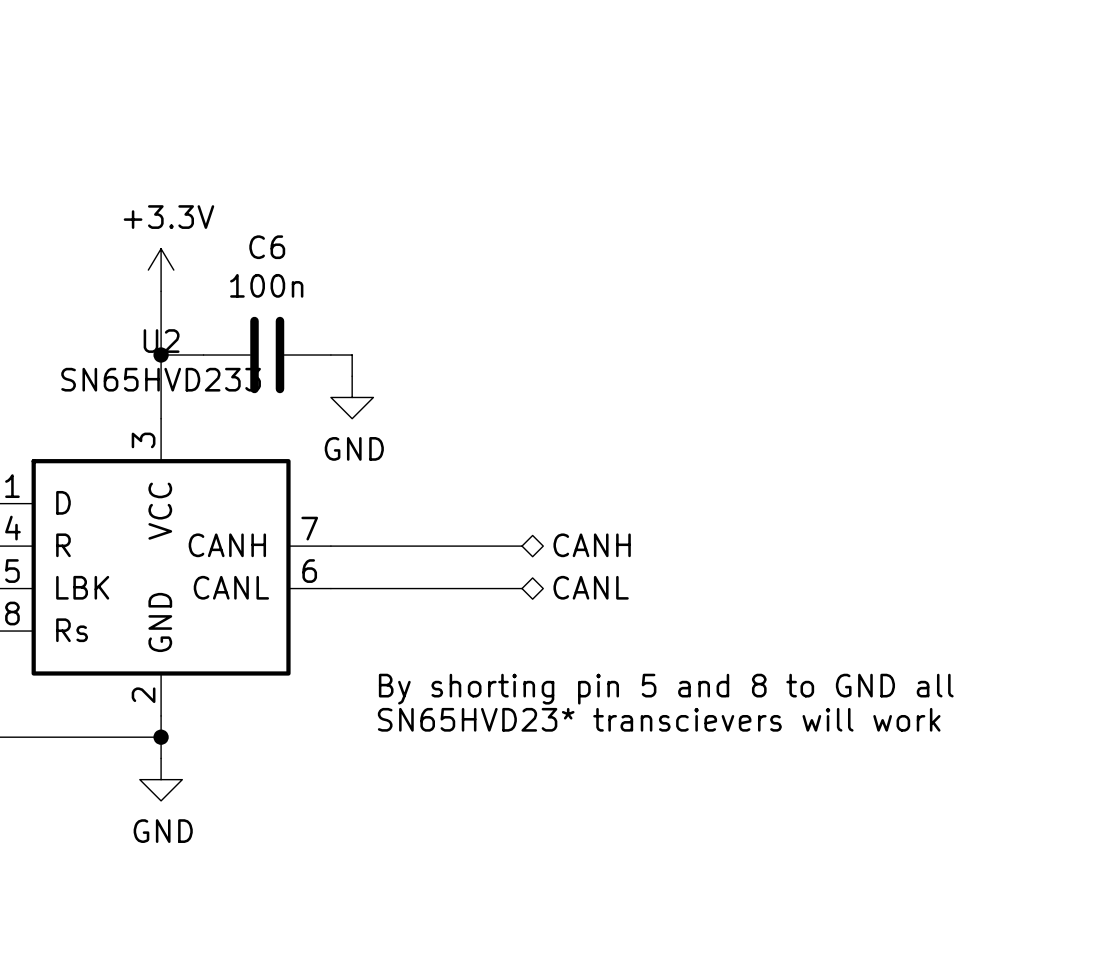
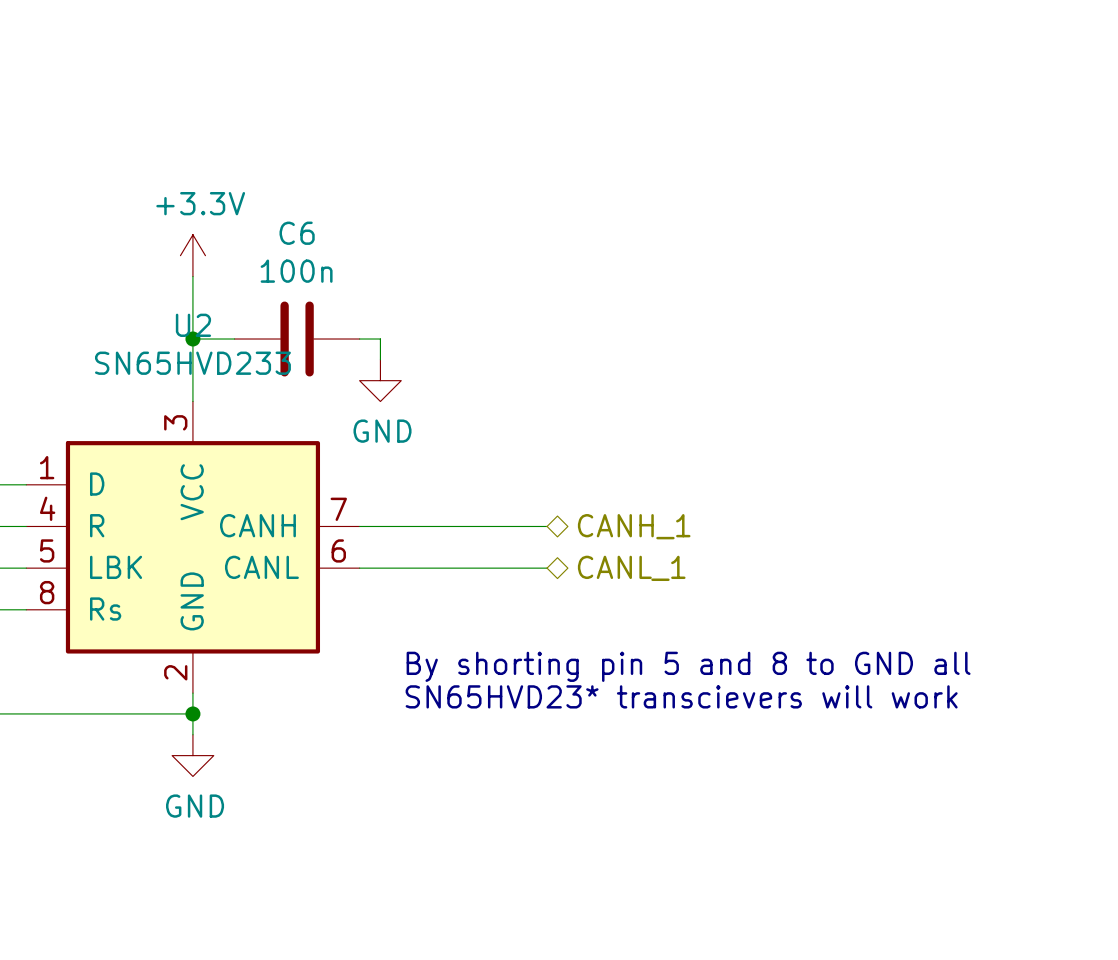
hierarchical label: CANH (592, 545) -> CANH_1 (634, 526)
hierarchical label: CANL (591, 587) -> CANL_1 (631, 568)

